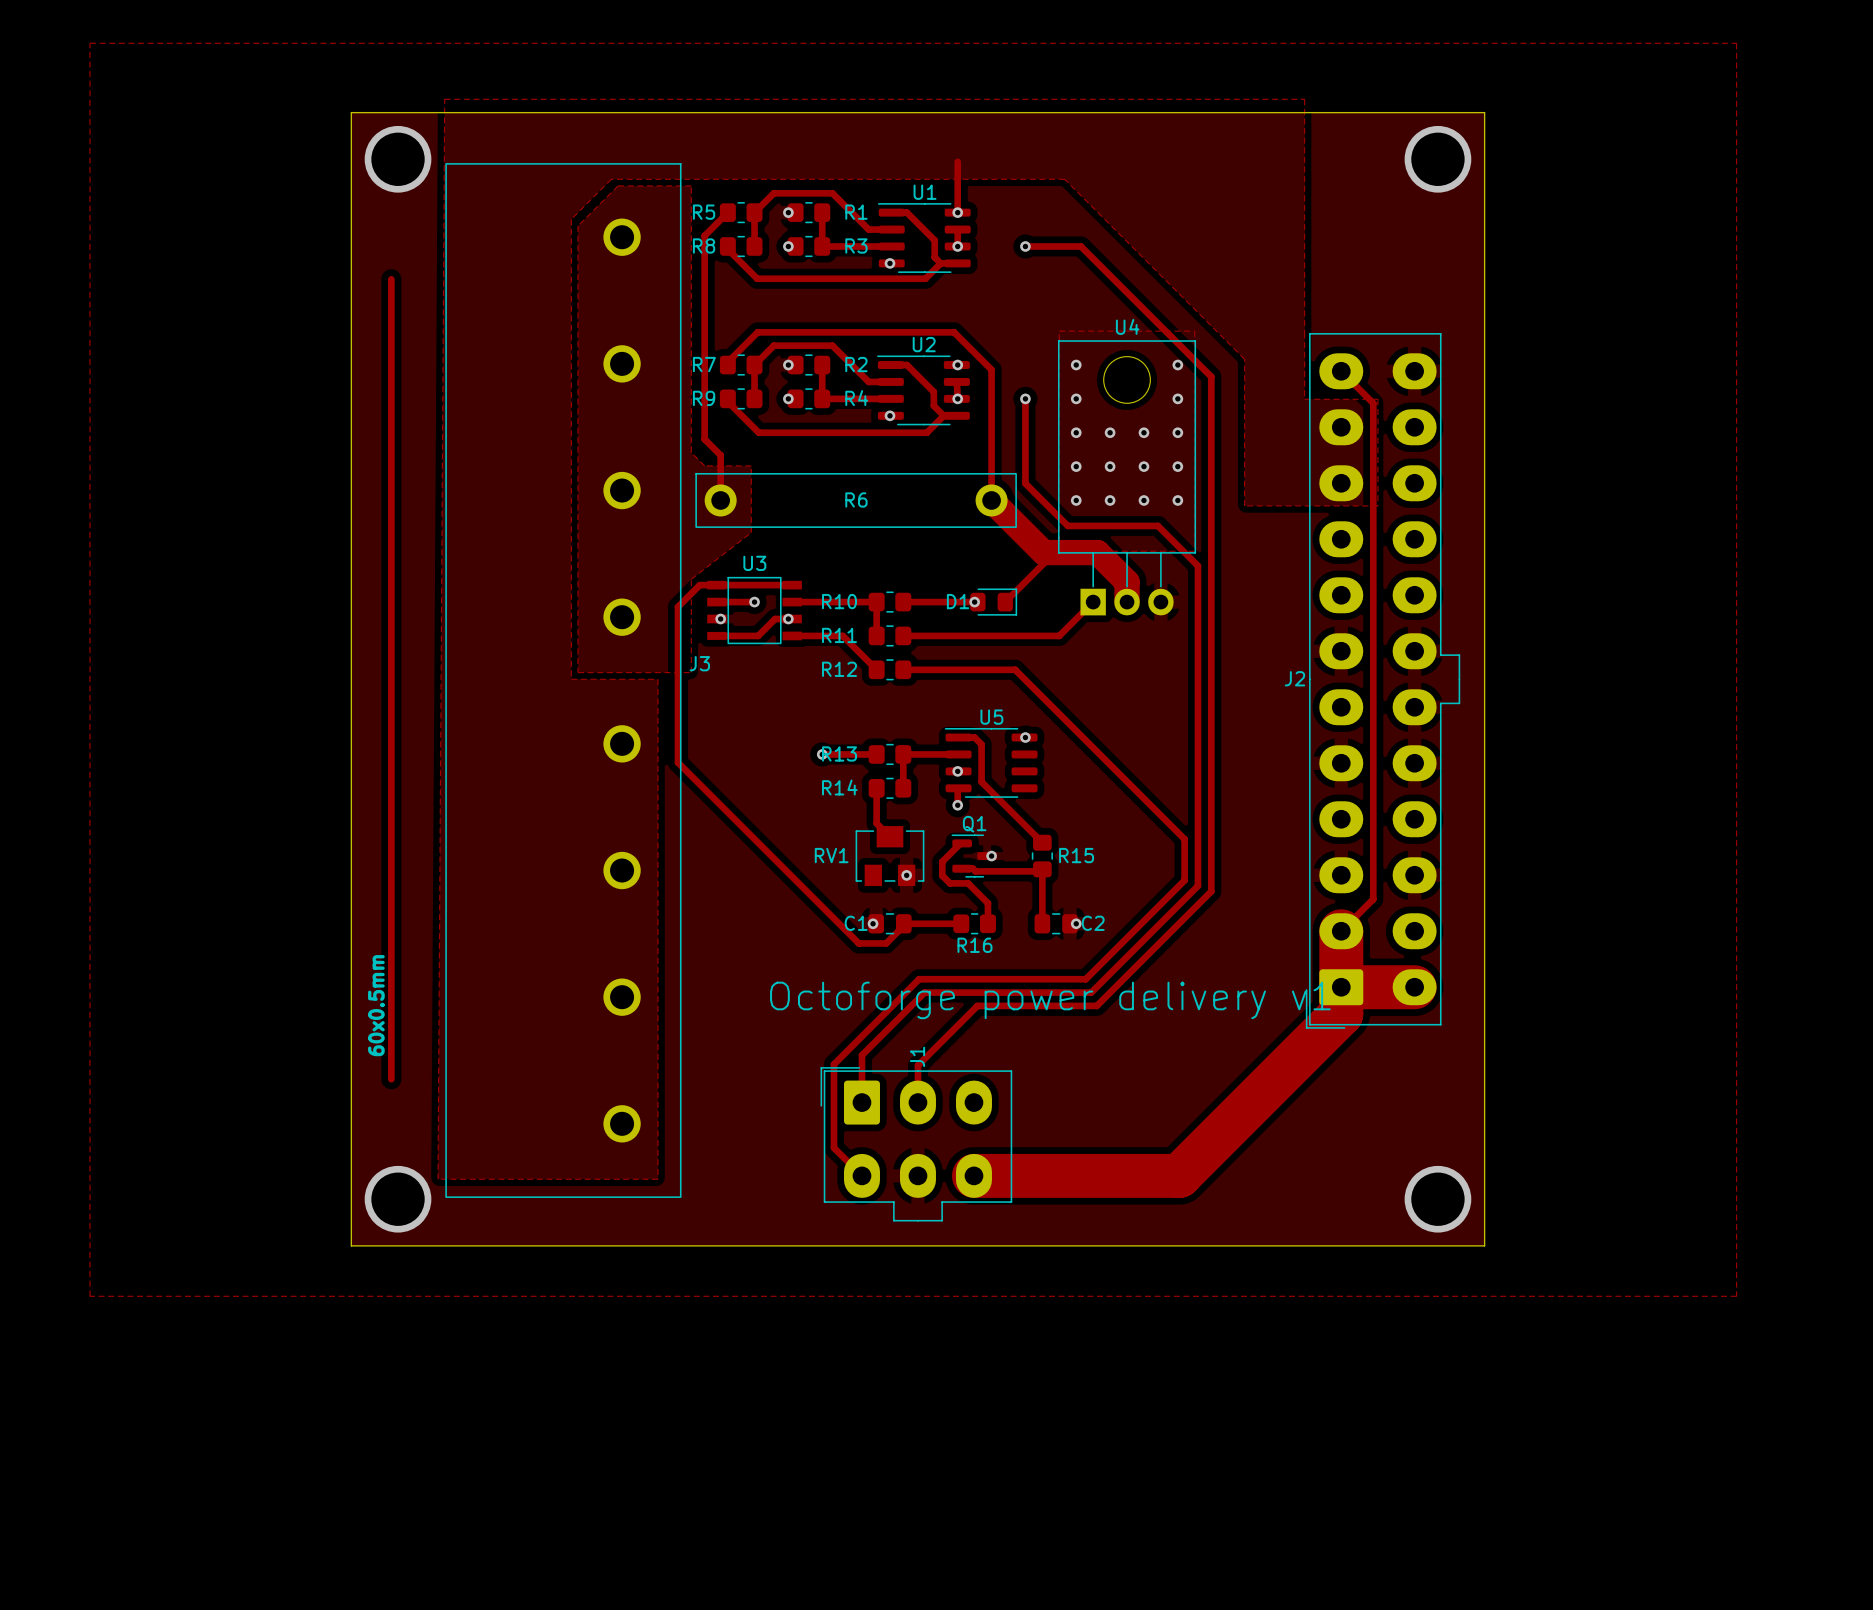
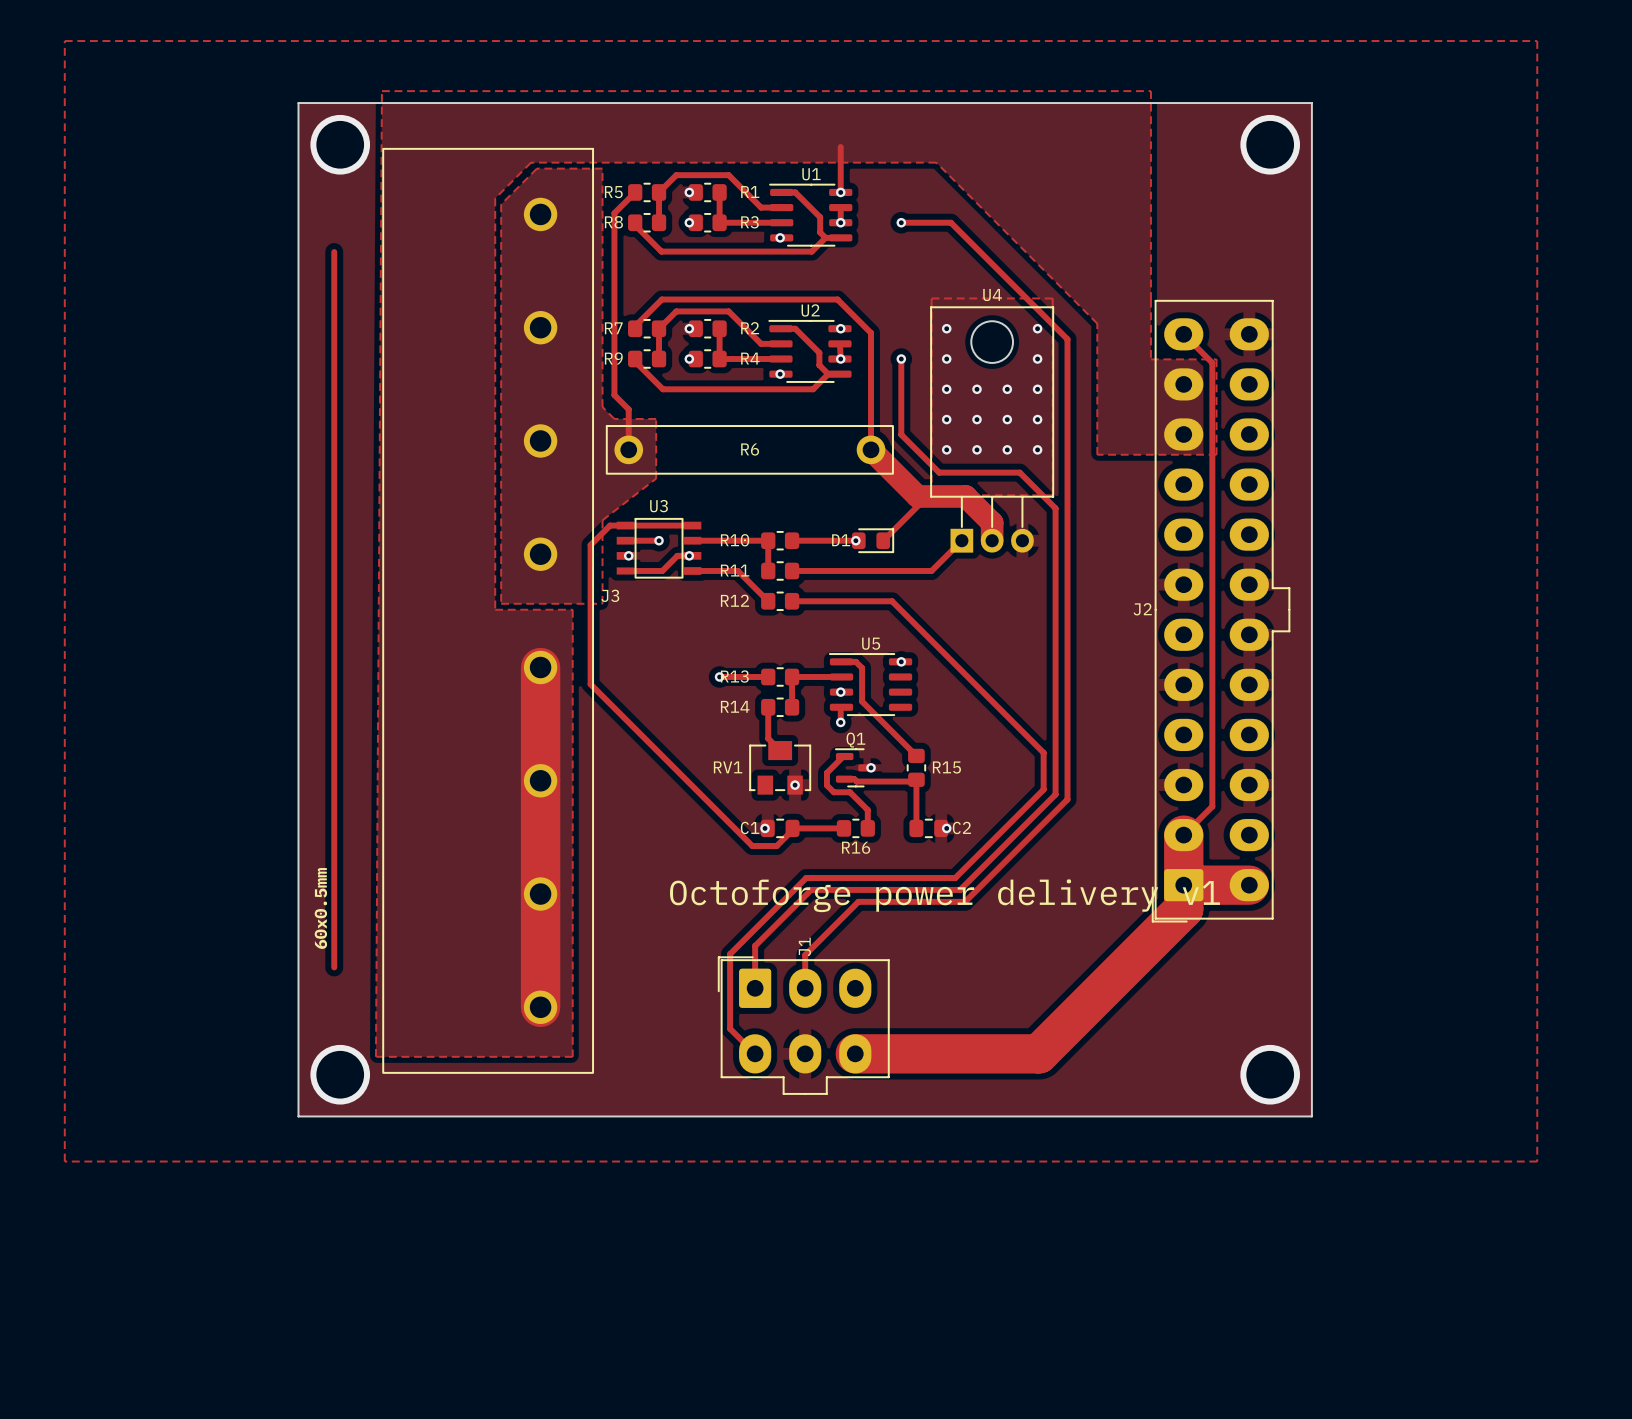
track: none -> (540, 667) (540, 1007)

